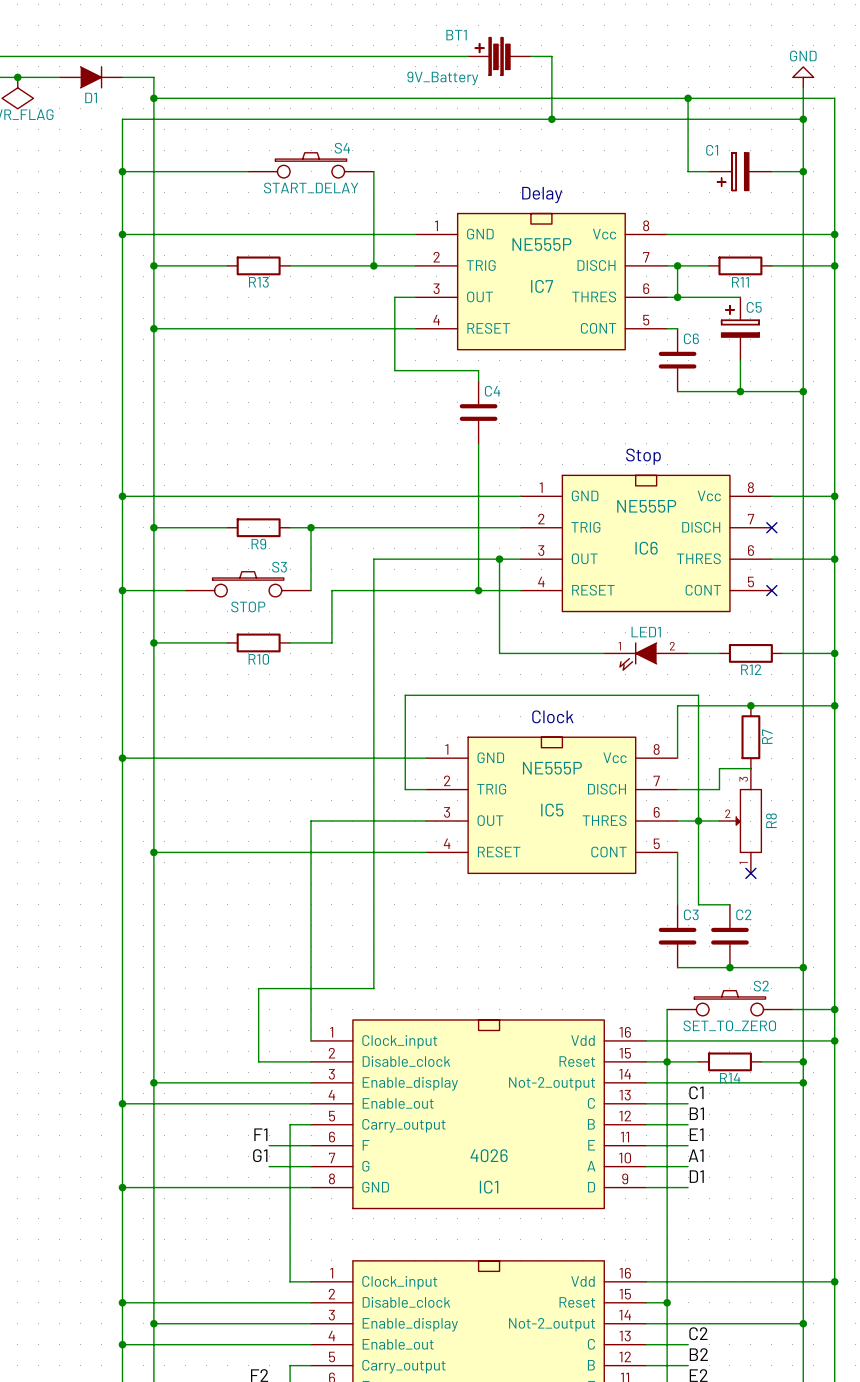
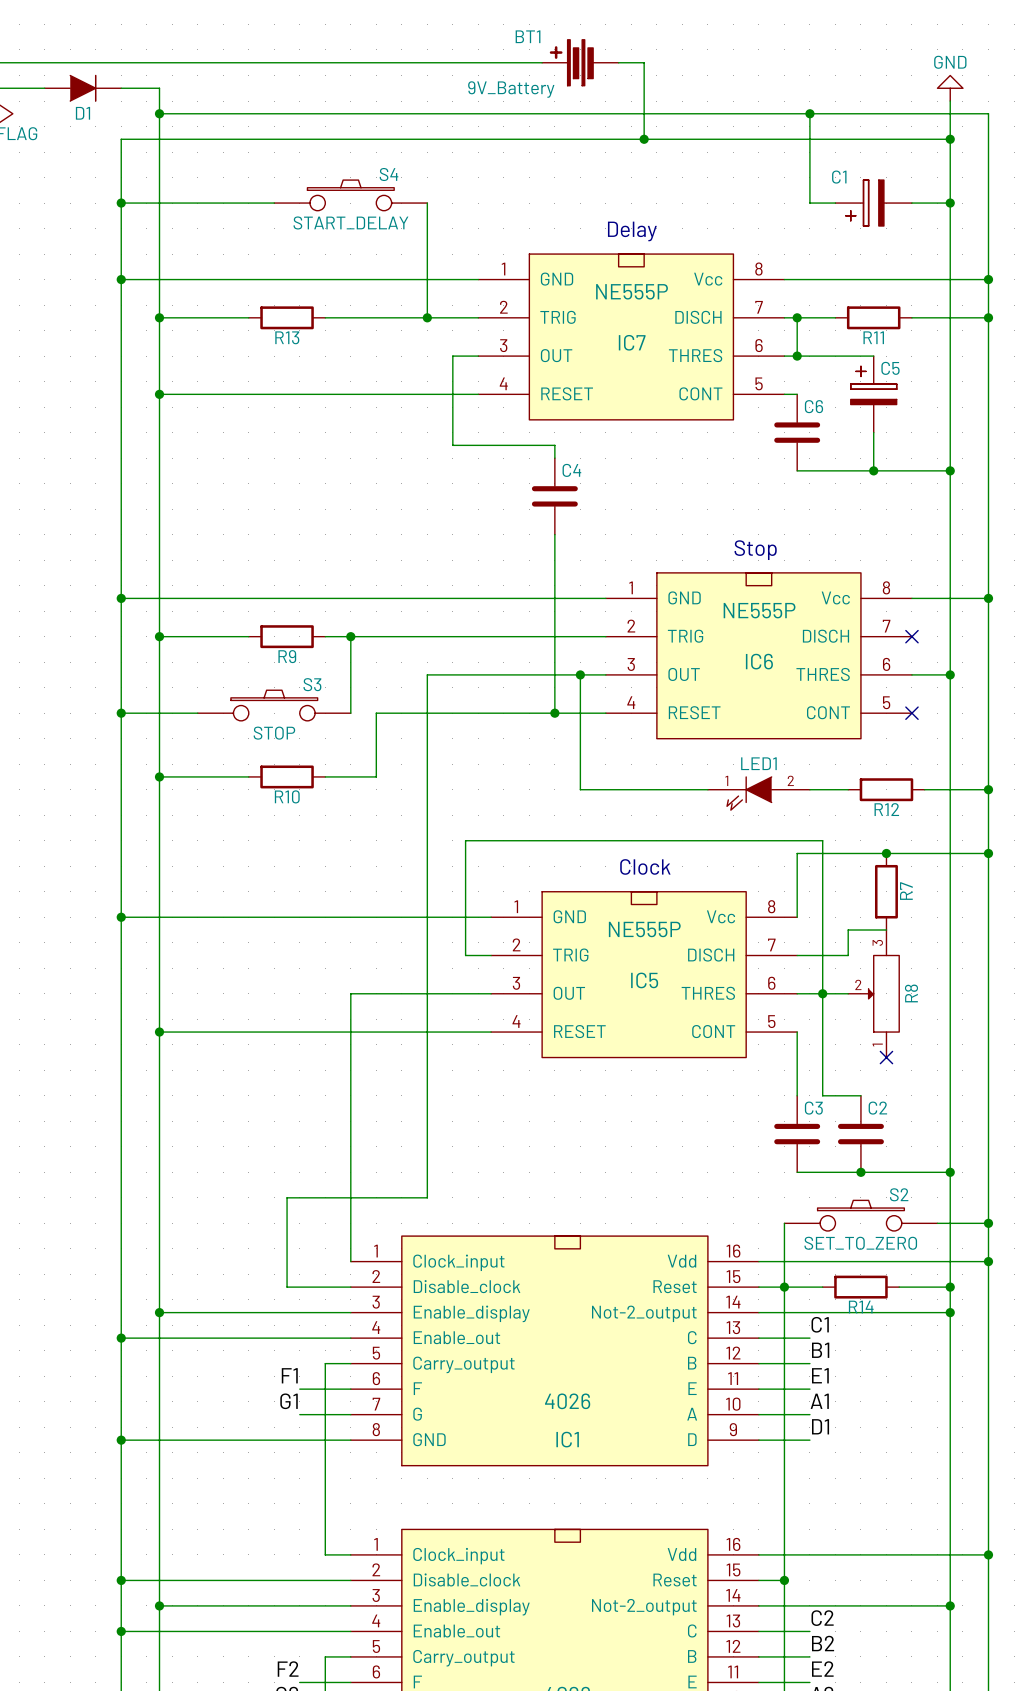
wire: (803, 559) (834, 559) -> none
junction position: (834, 559) -> (950, 674)

